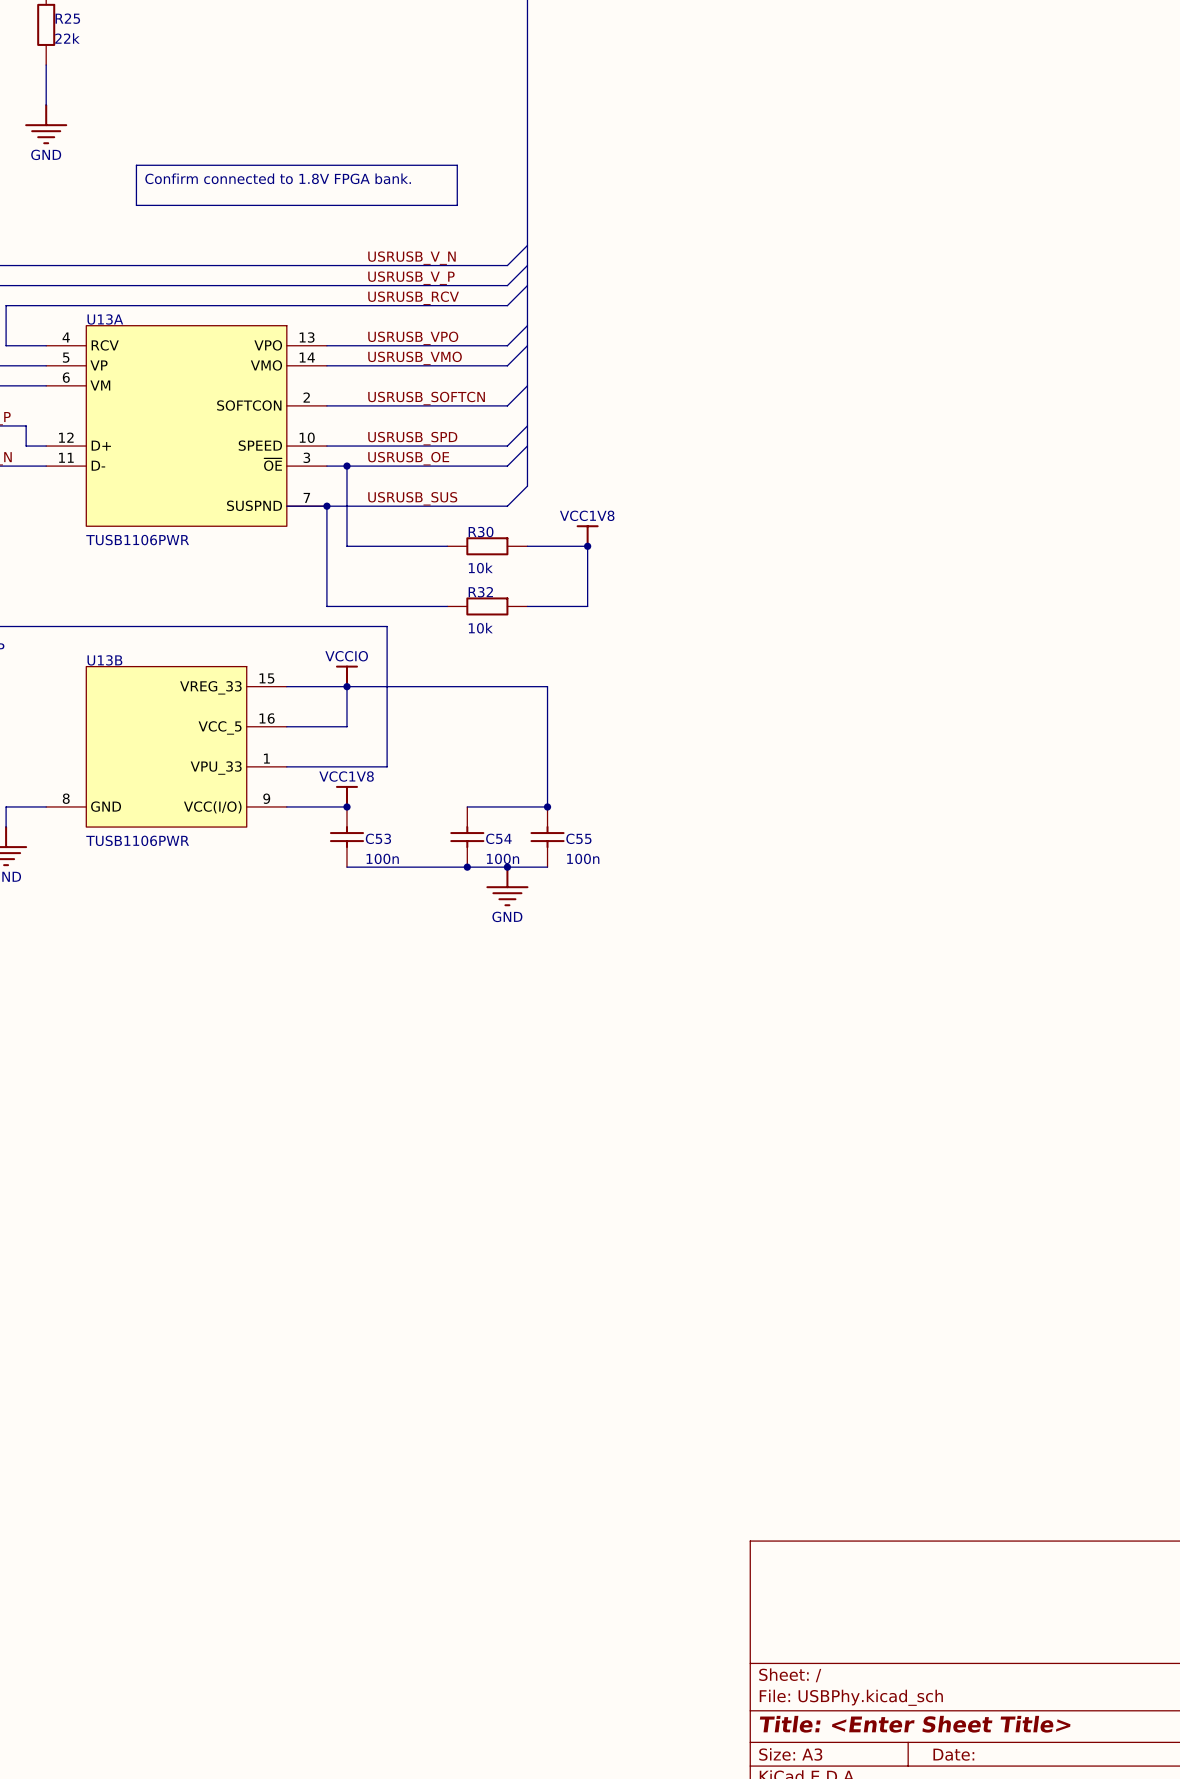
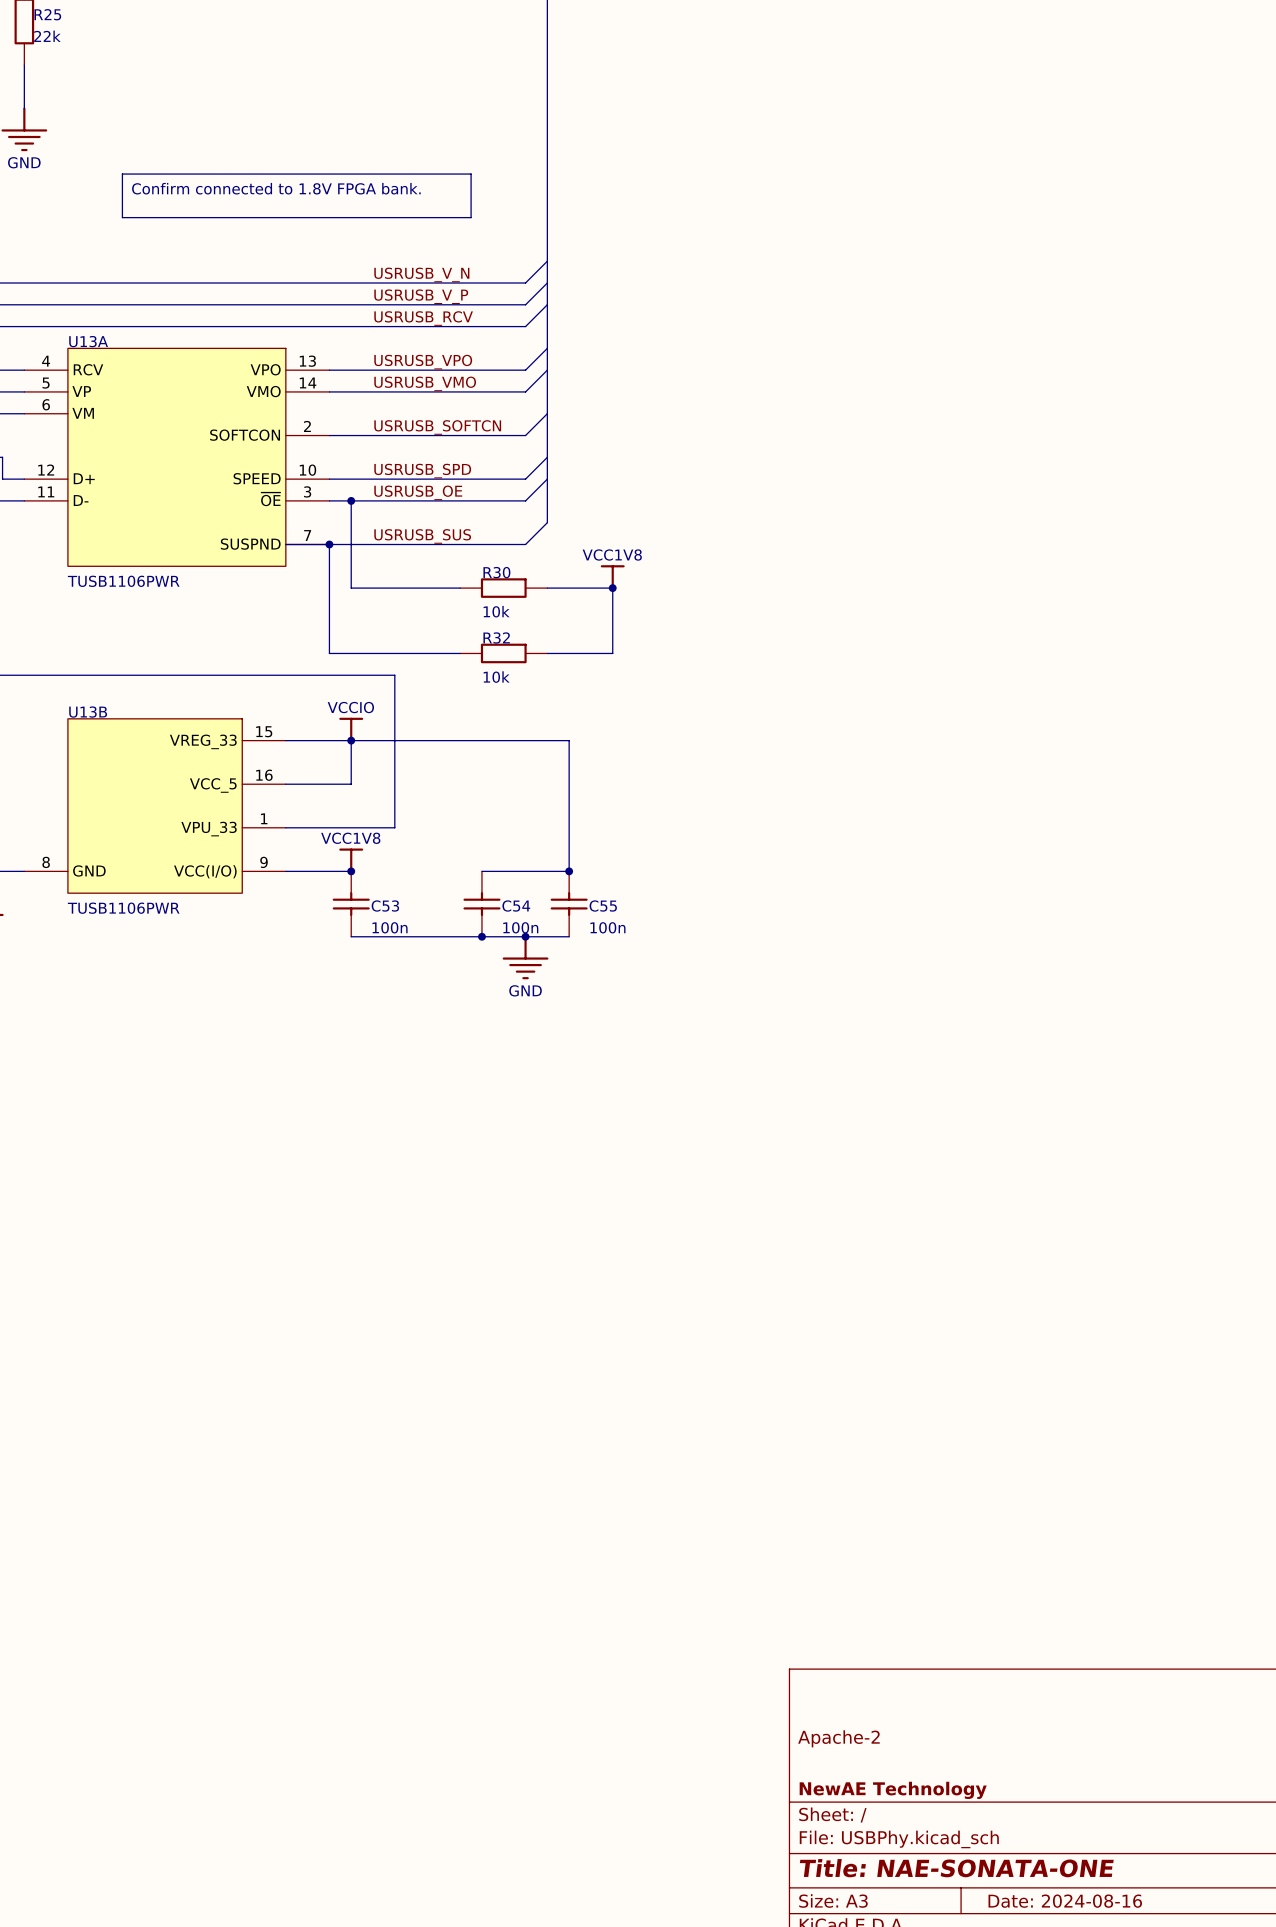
title block: none -> Apache-2 (838, 1738)
title block: none -> NewAE Technology (893, 1790)
title block: Title: <Enter Sheet Title> (915, 1724) -> Title: NAE-SONATA-ONE (956, 1868)
title block: Date: (953, 1754) -> Date: 2024-08-16 (1065, 1901)

